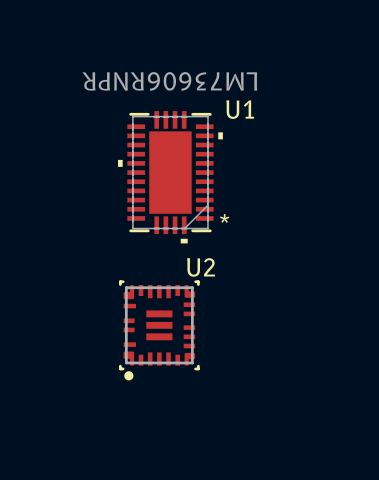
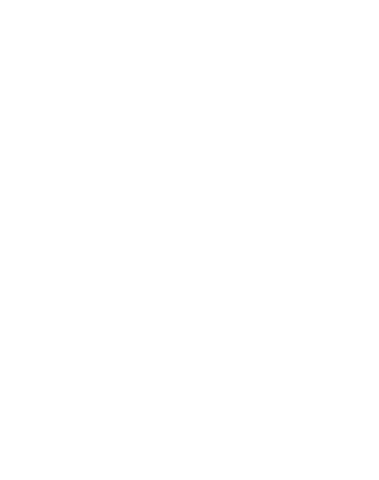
U1: LM73606RNPR (170, 177) -> none
U2: (159, 330) -> none

